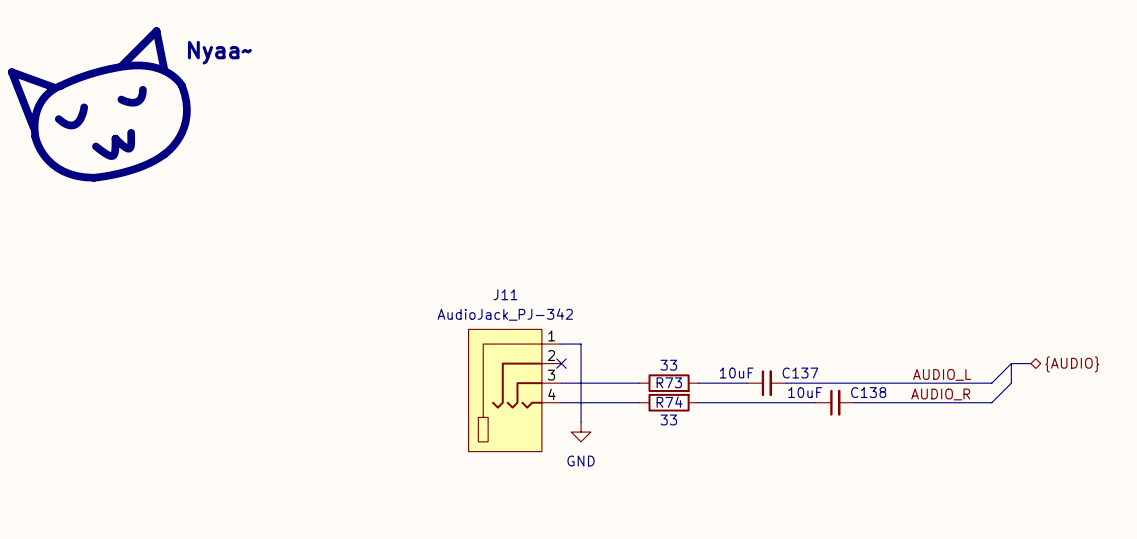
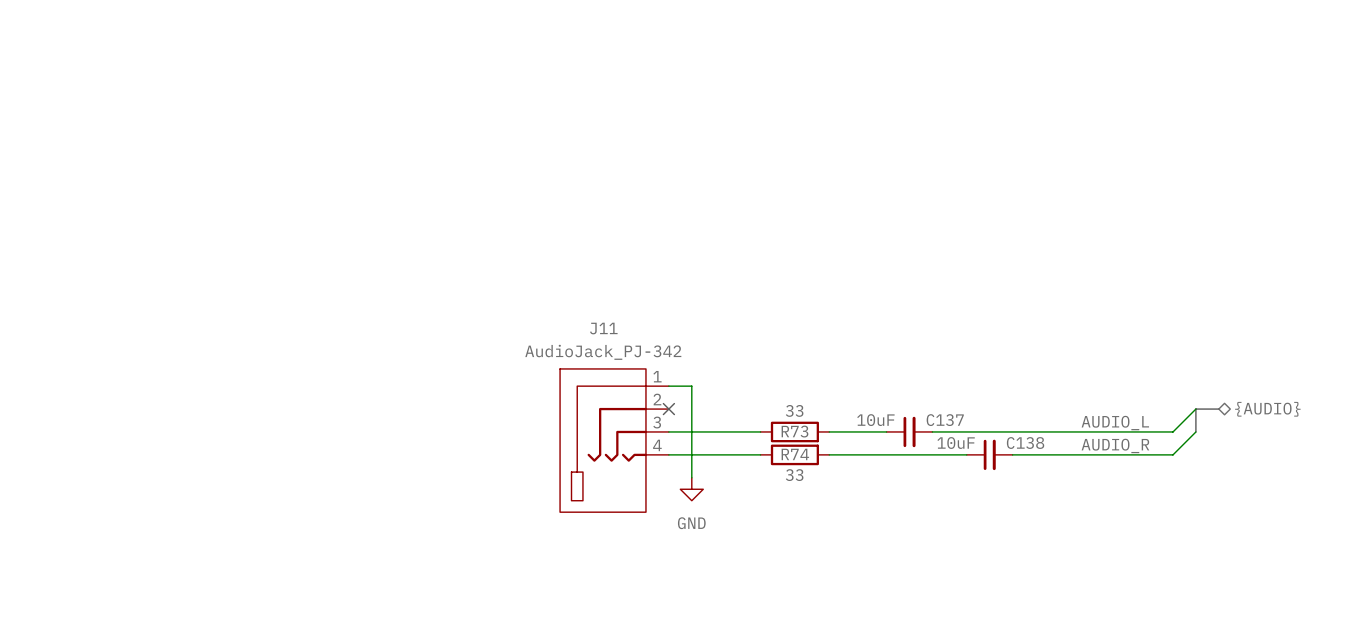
text: Nyaa~ (219, 52) -> none
line: (121, 66) (156, 31) (164, 70) -> none
line: (125, 66) (140, 65) (157, 68) (169, 73) (181, 84) (186, 101) (186, 115) (184, 127) (177, 141) (167, 151) (154, 160) (119, 173) (84, 177) (69, 173) (57, 168) (45, 157) (35, 138) (35, 116) (40, 102) (51, 91) (72, 80) (99, 71) (125, 66) -> none
line: (54, 87) (11, 72) (33, 126) -> none
line: (142, 89) (141, 96) (137, 101) (130, 102) (121, 99) -> none
line: (84, 107) (80, 118) (74, 125) (66, 124) (58, 119) -> none
line: (131, 132) (129, 148) (115, 138) (113, 155) (107, 154) (95, 146) -> none

